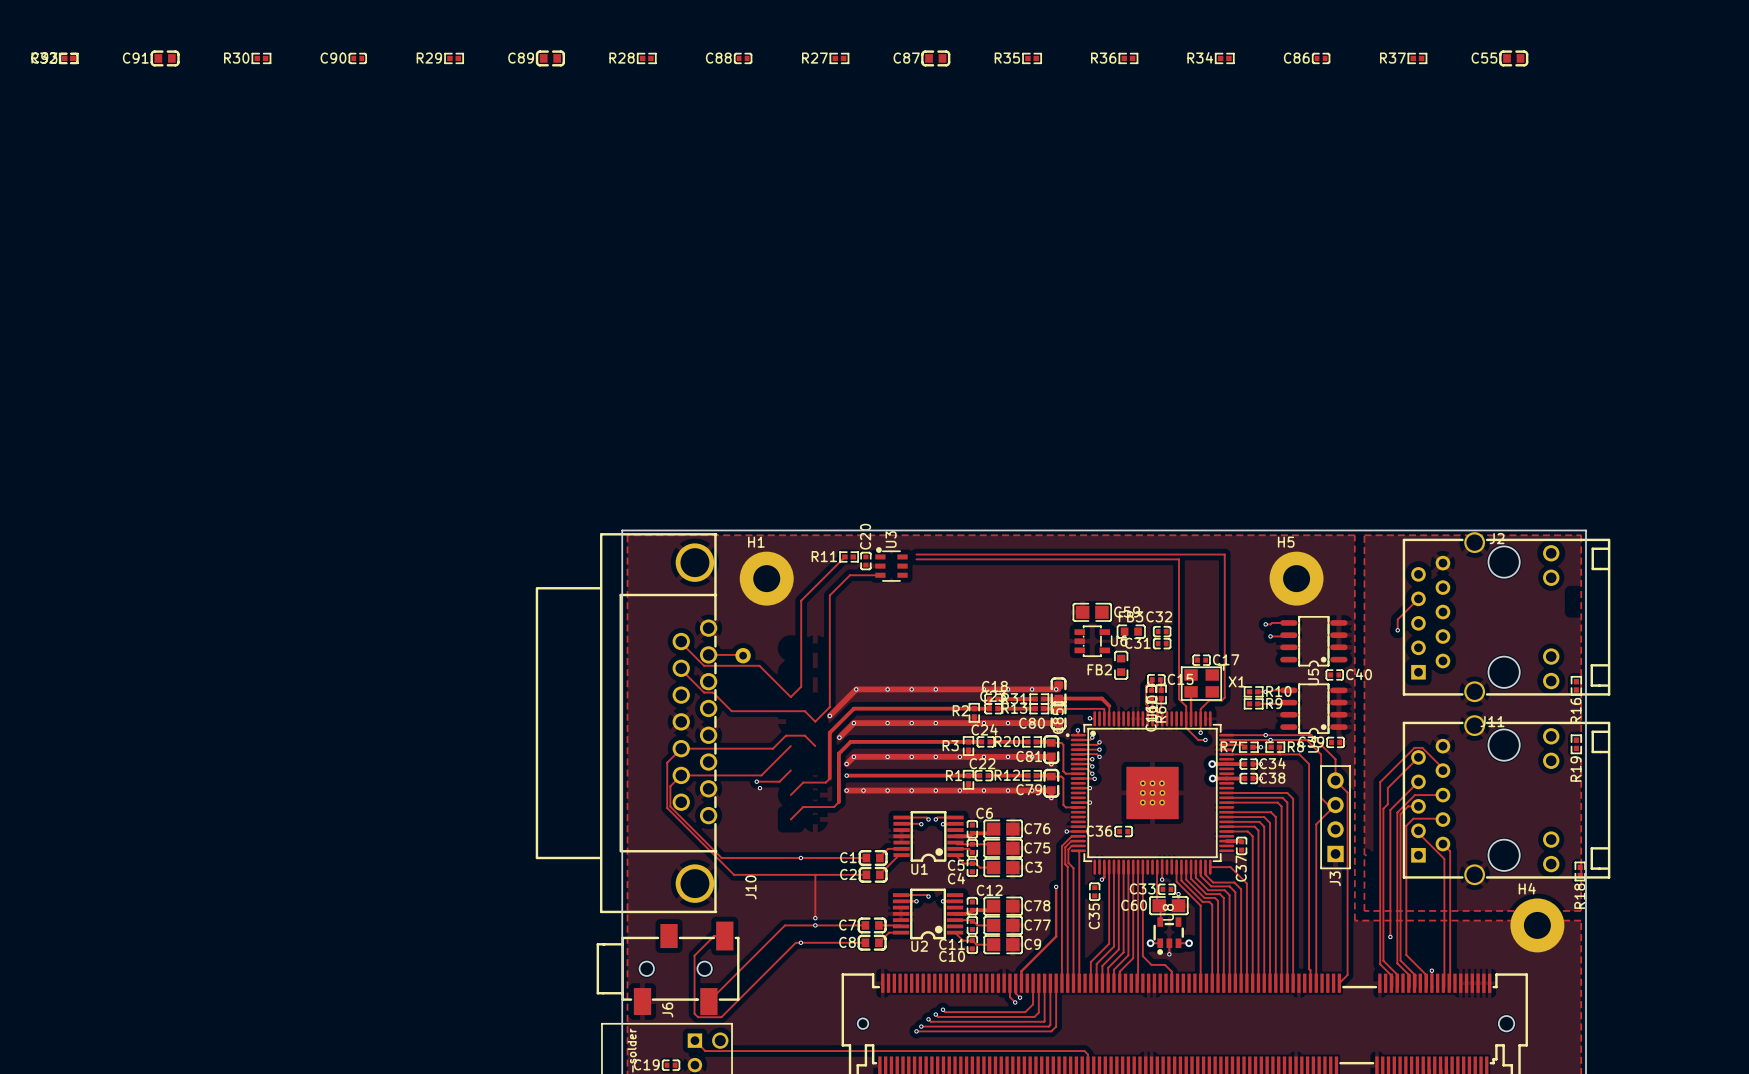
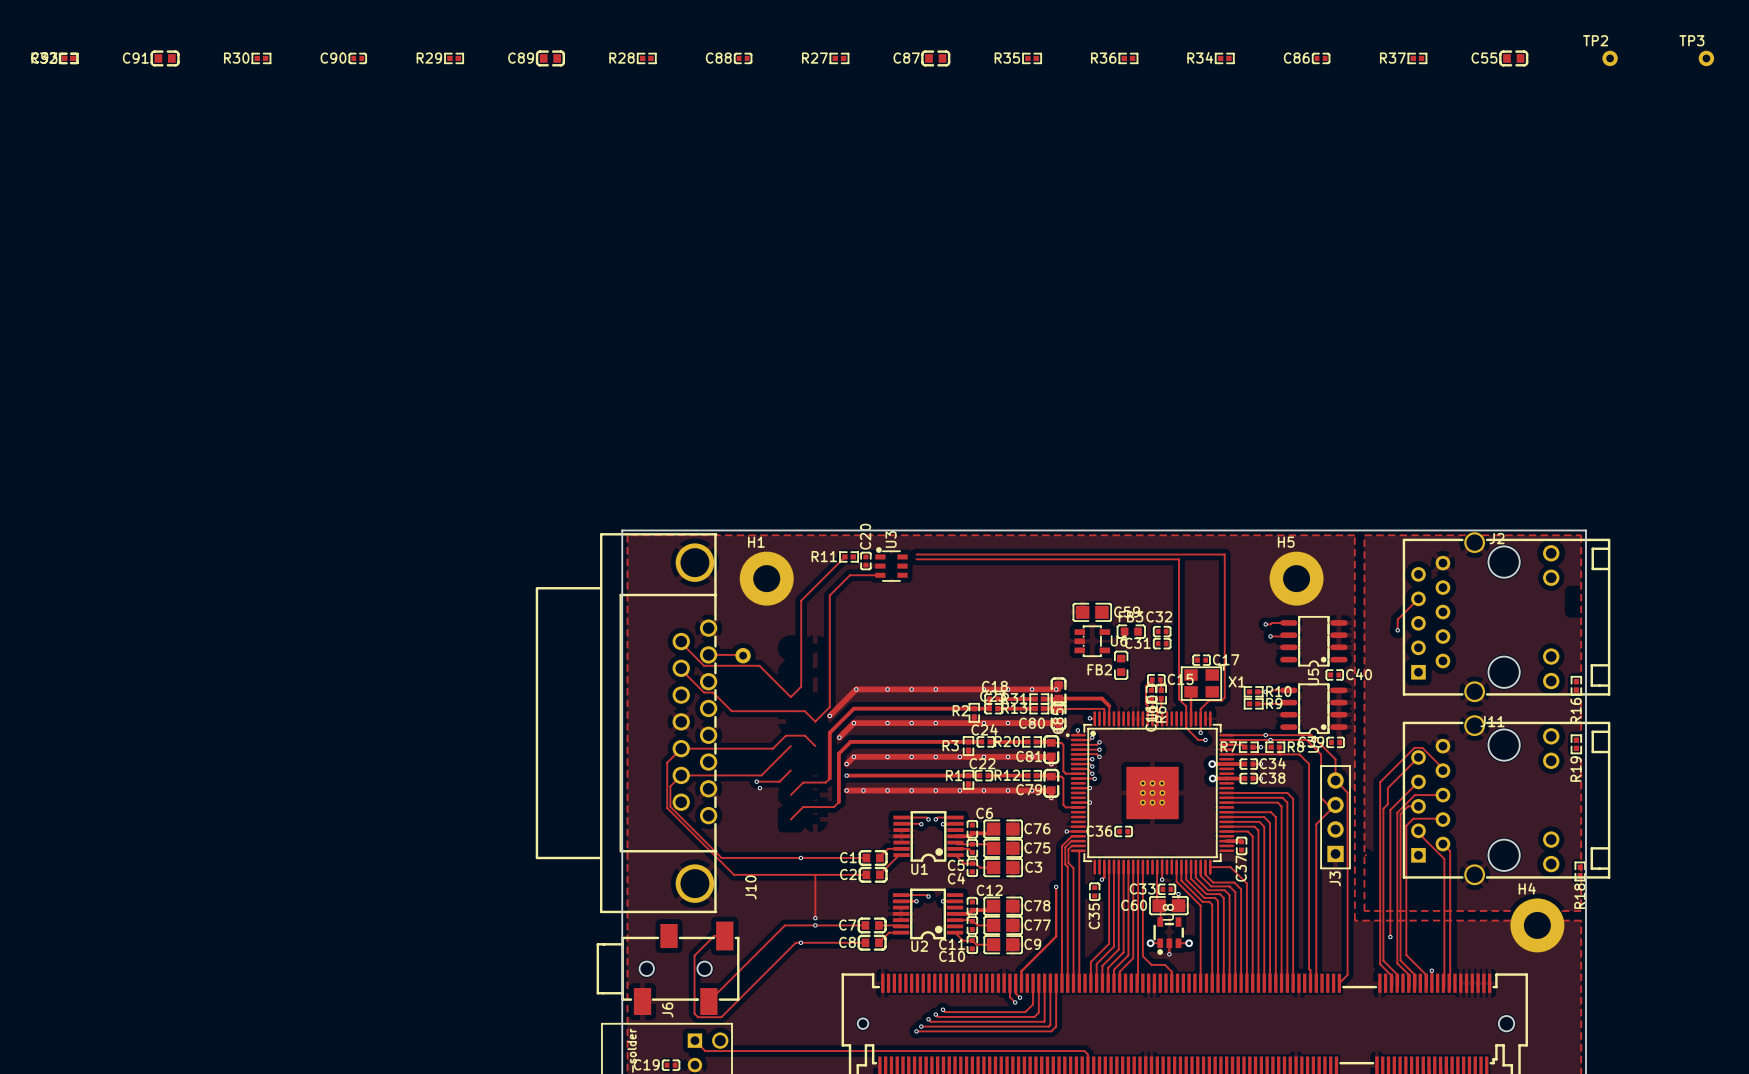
TP2: none -> (1610, 58)
TP3: none -> (1706, 58)

